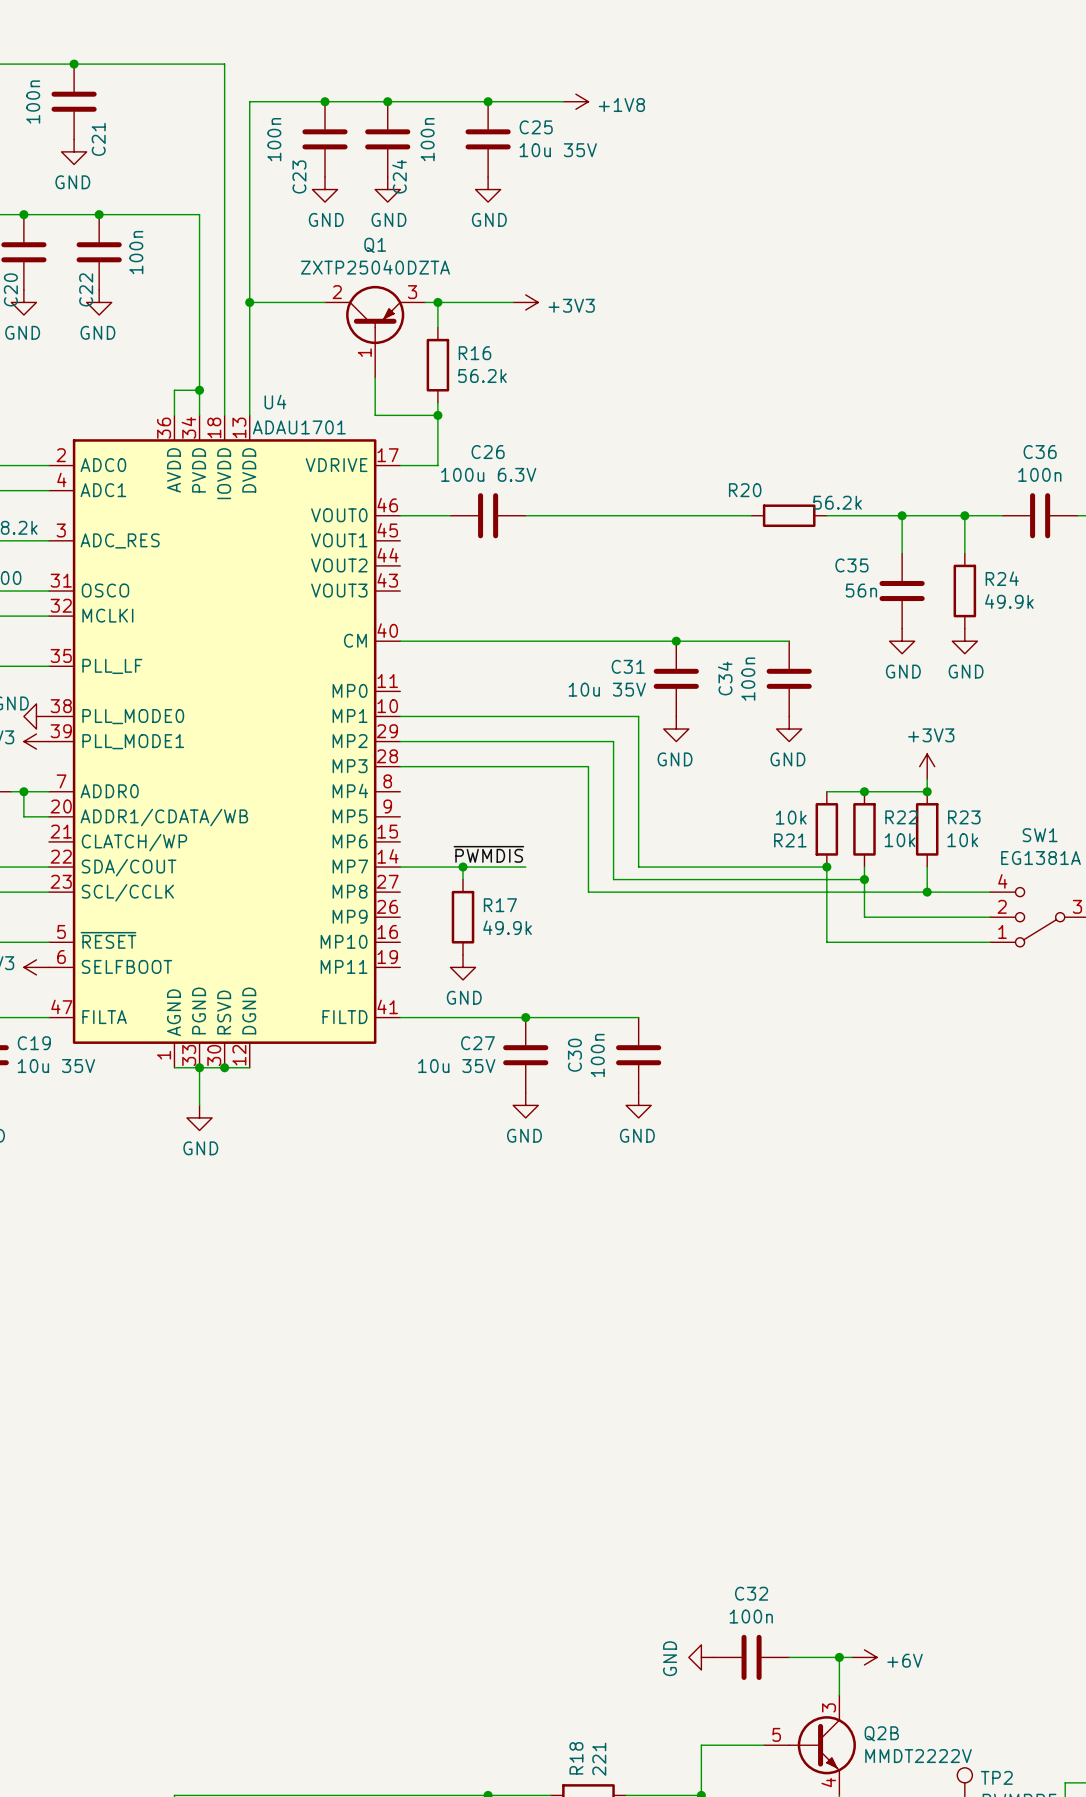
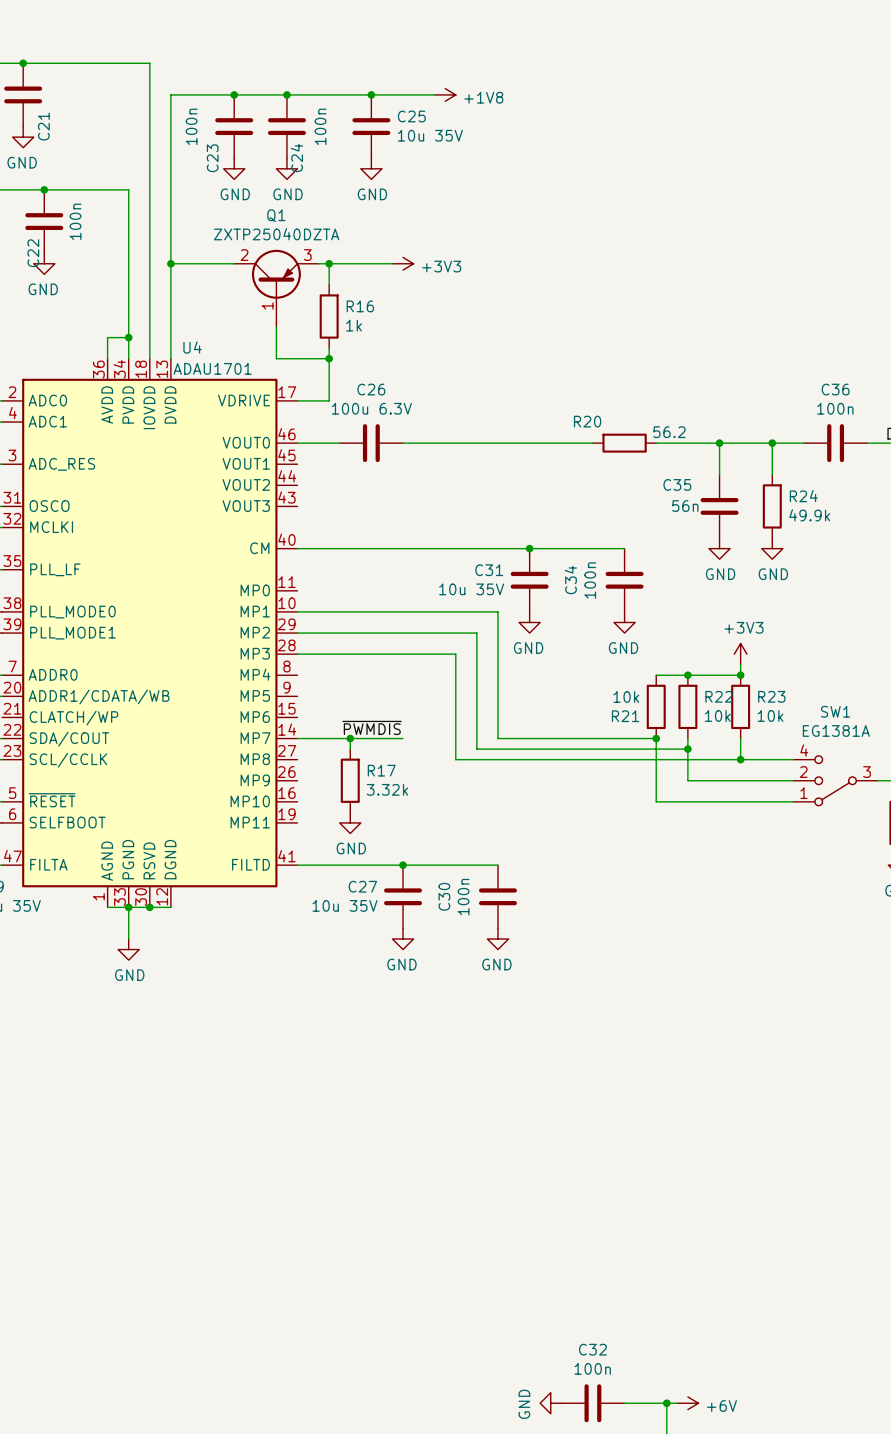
R16 value: 56.2k (482, 376) -> 1k (354, 325)
R20 value: 56.2k (837, 502) -> 56.2 (669, 432)
R17 value: 49.9k (507, 927) -> 3.32k (387, 789)

